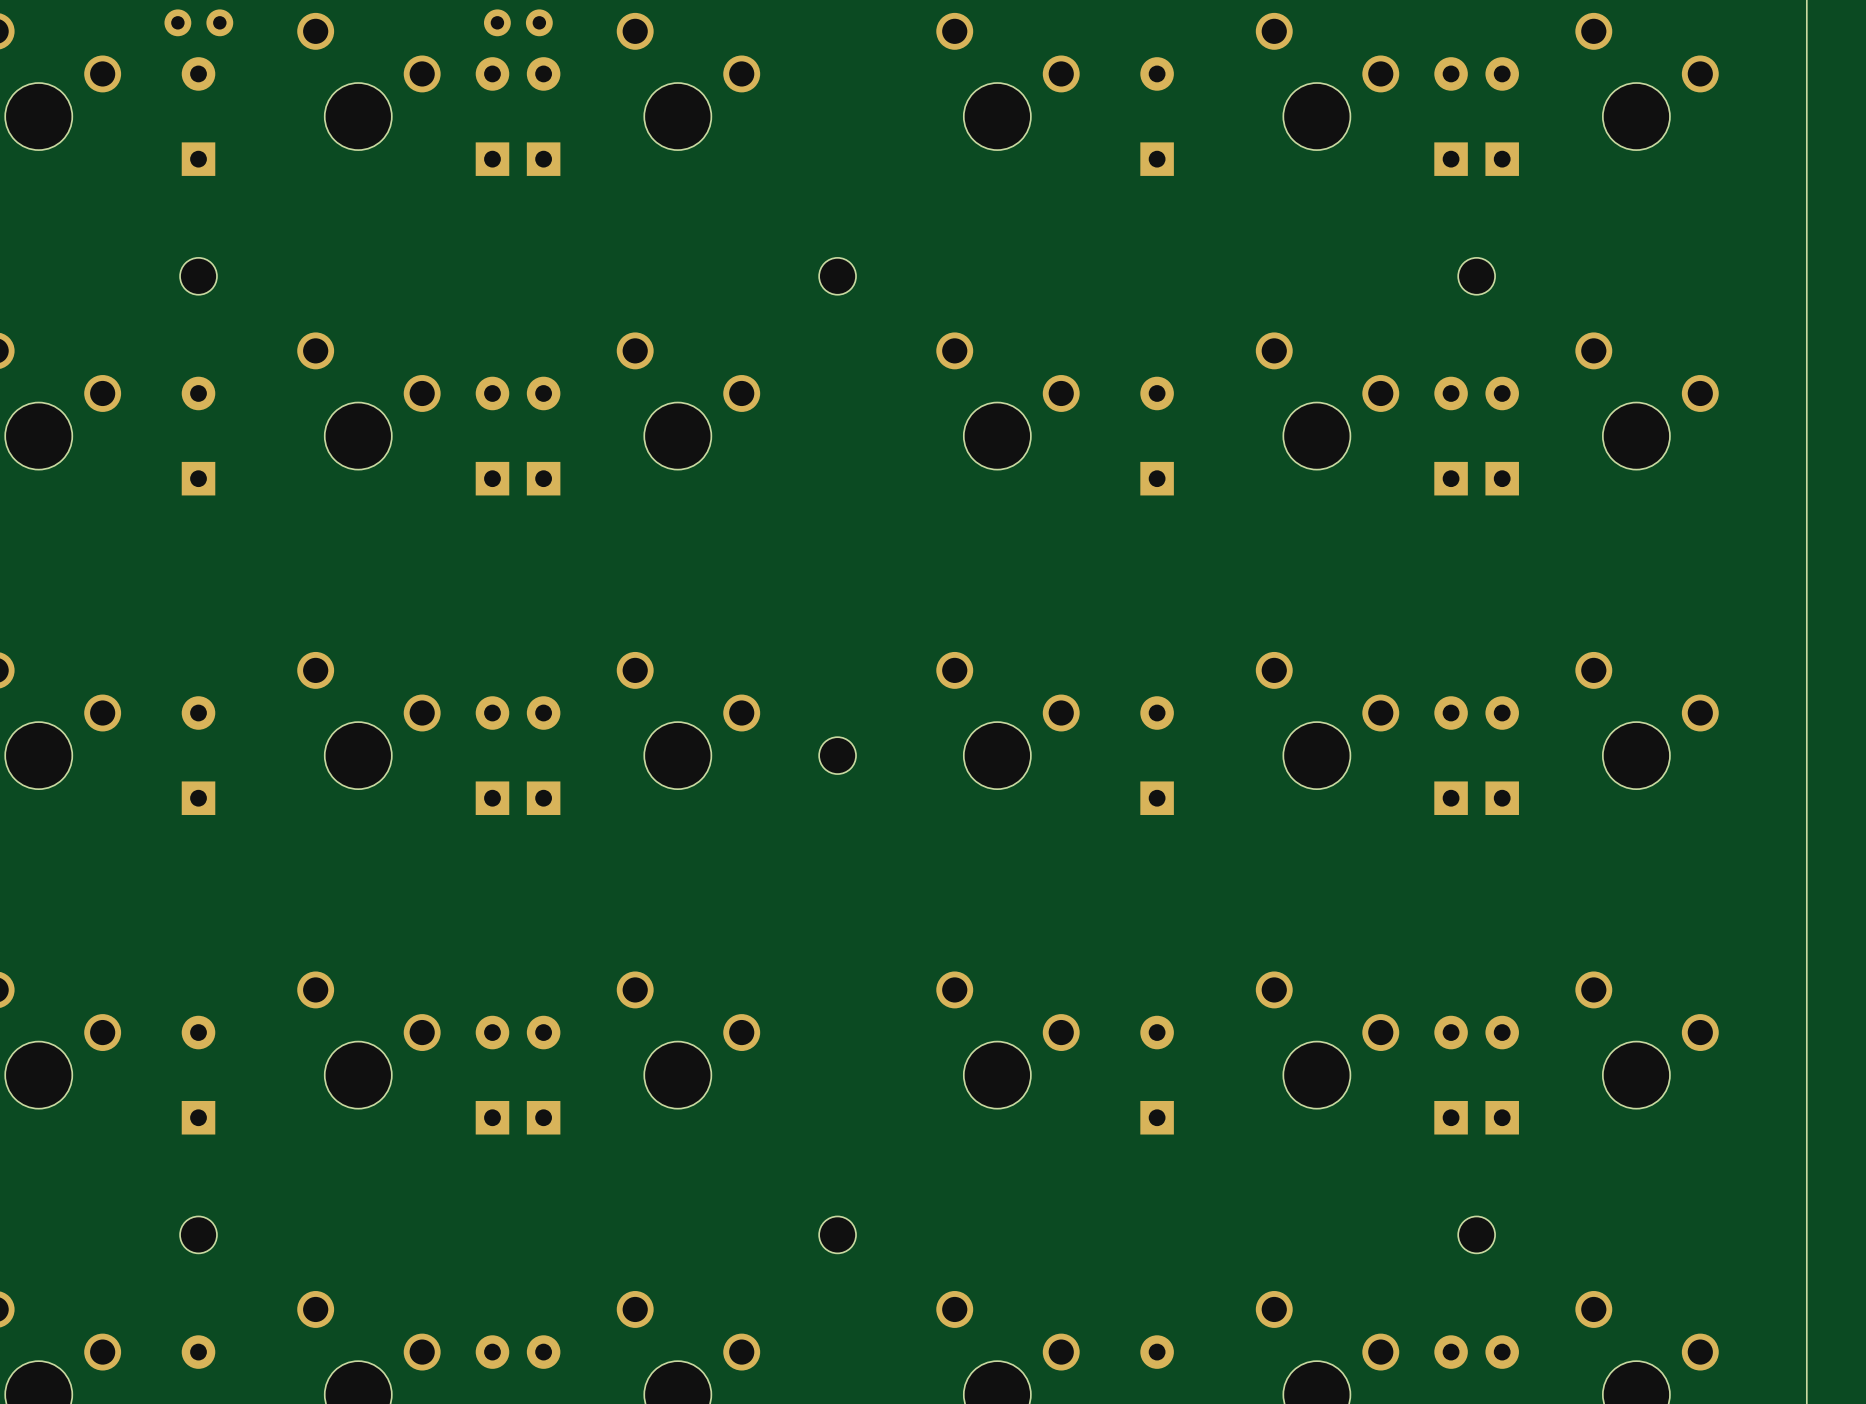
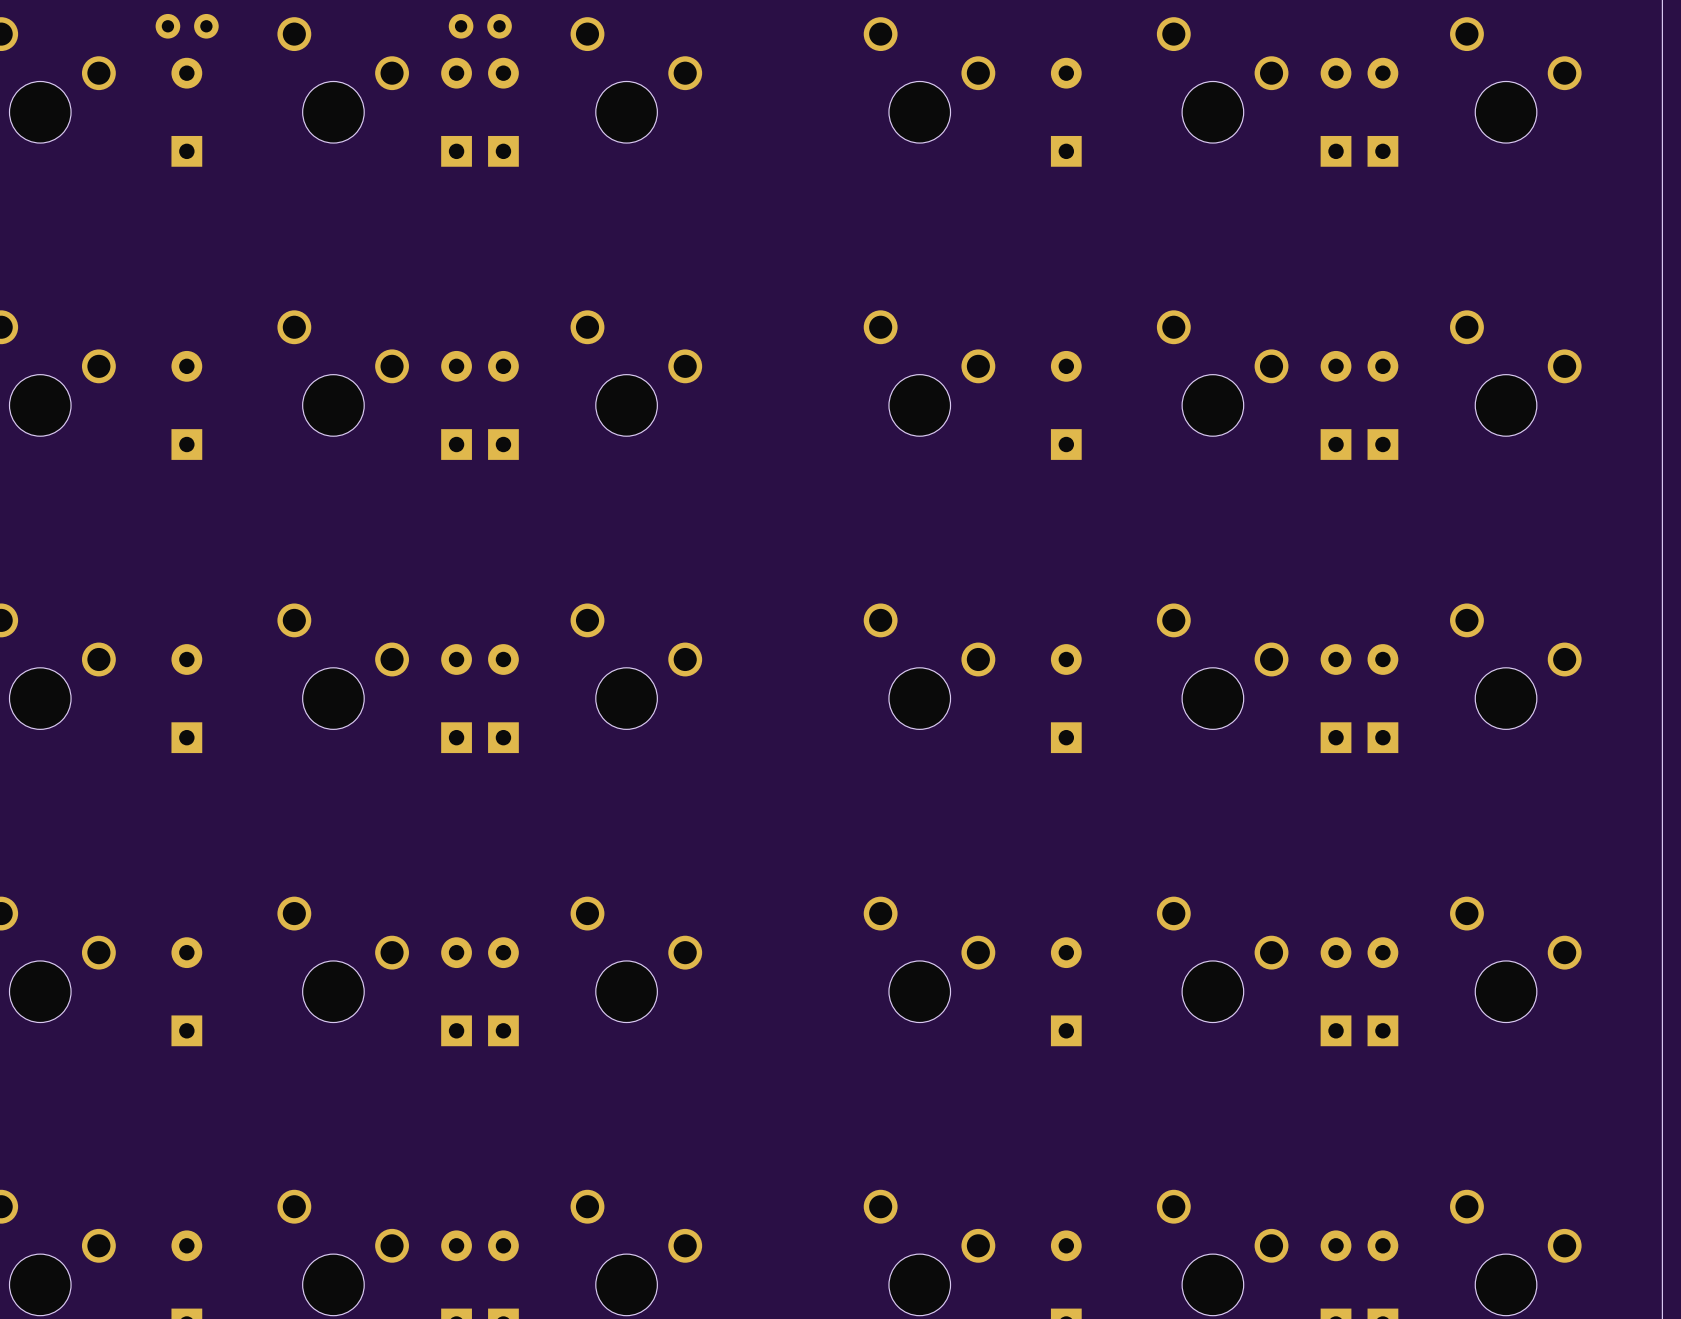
part: (198, 276) -> none
part: (837, 276) -> none
part: (1476, 276) -> none
part: (837, 755) -> none
part: (198, 1234) -> none
part: (837, 1234) -> none
part: (1476, 1234) -> none

